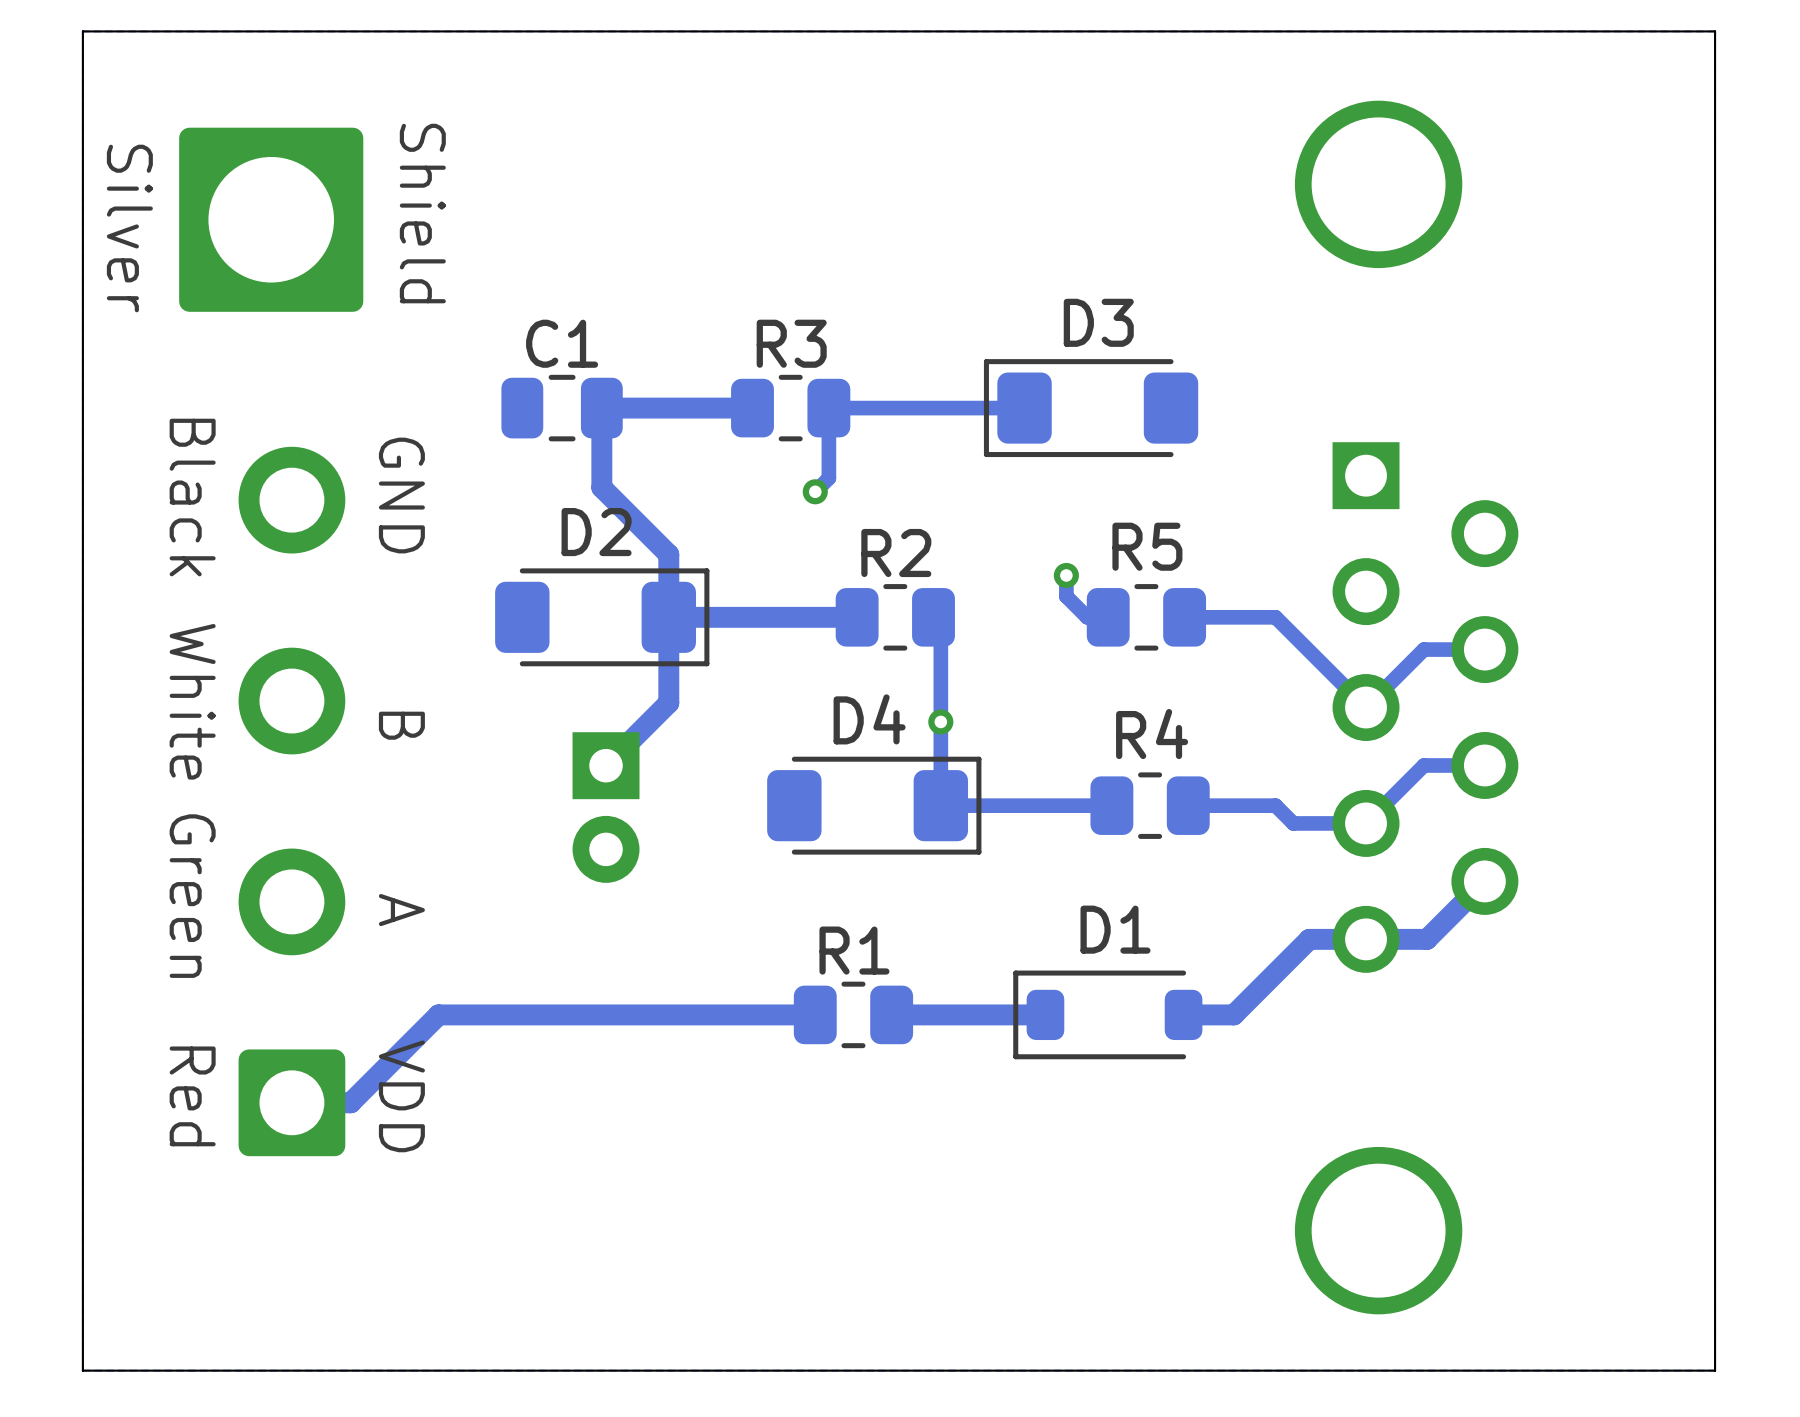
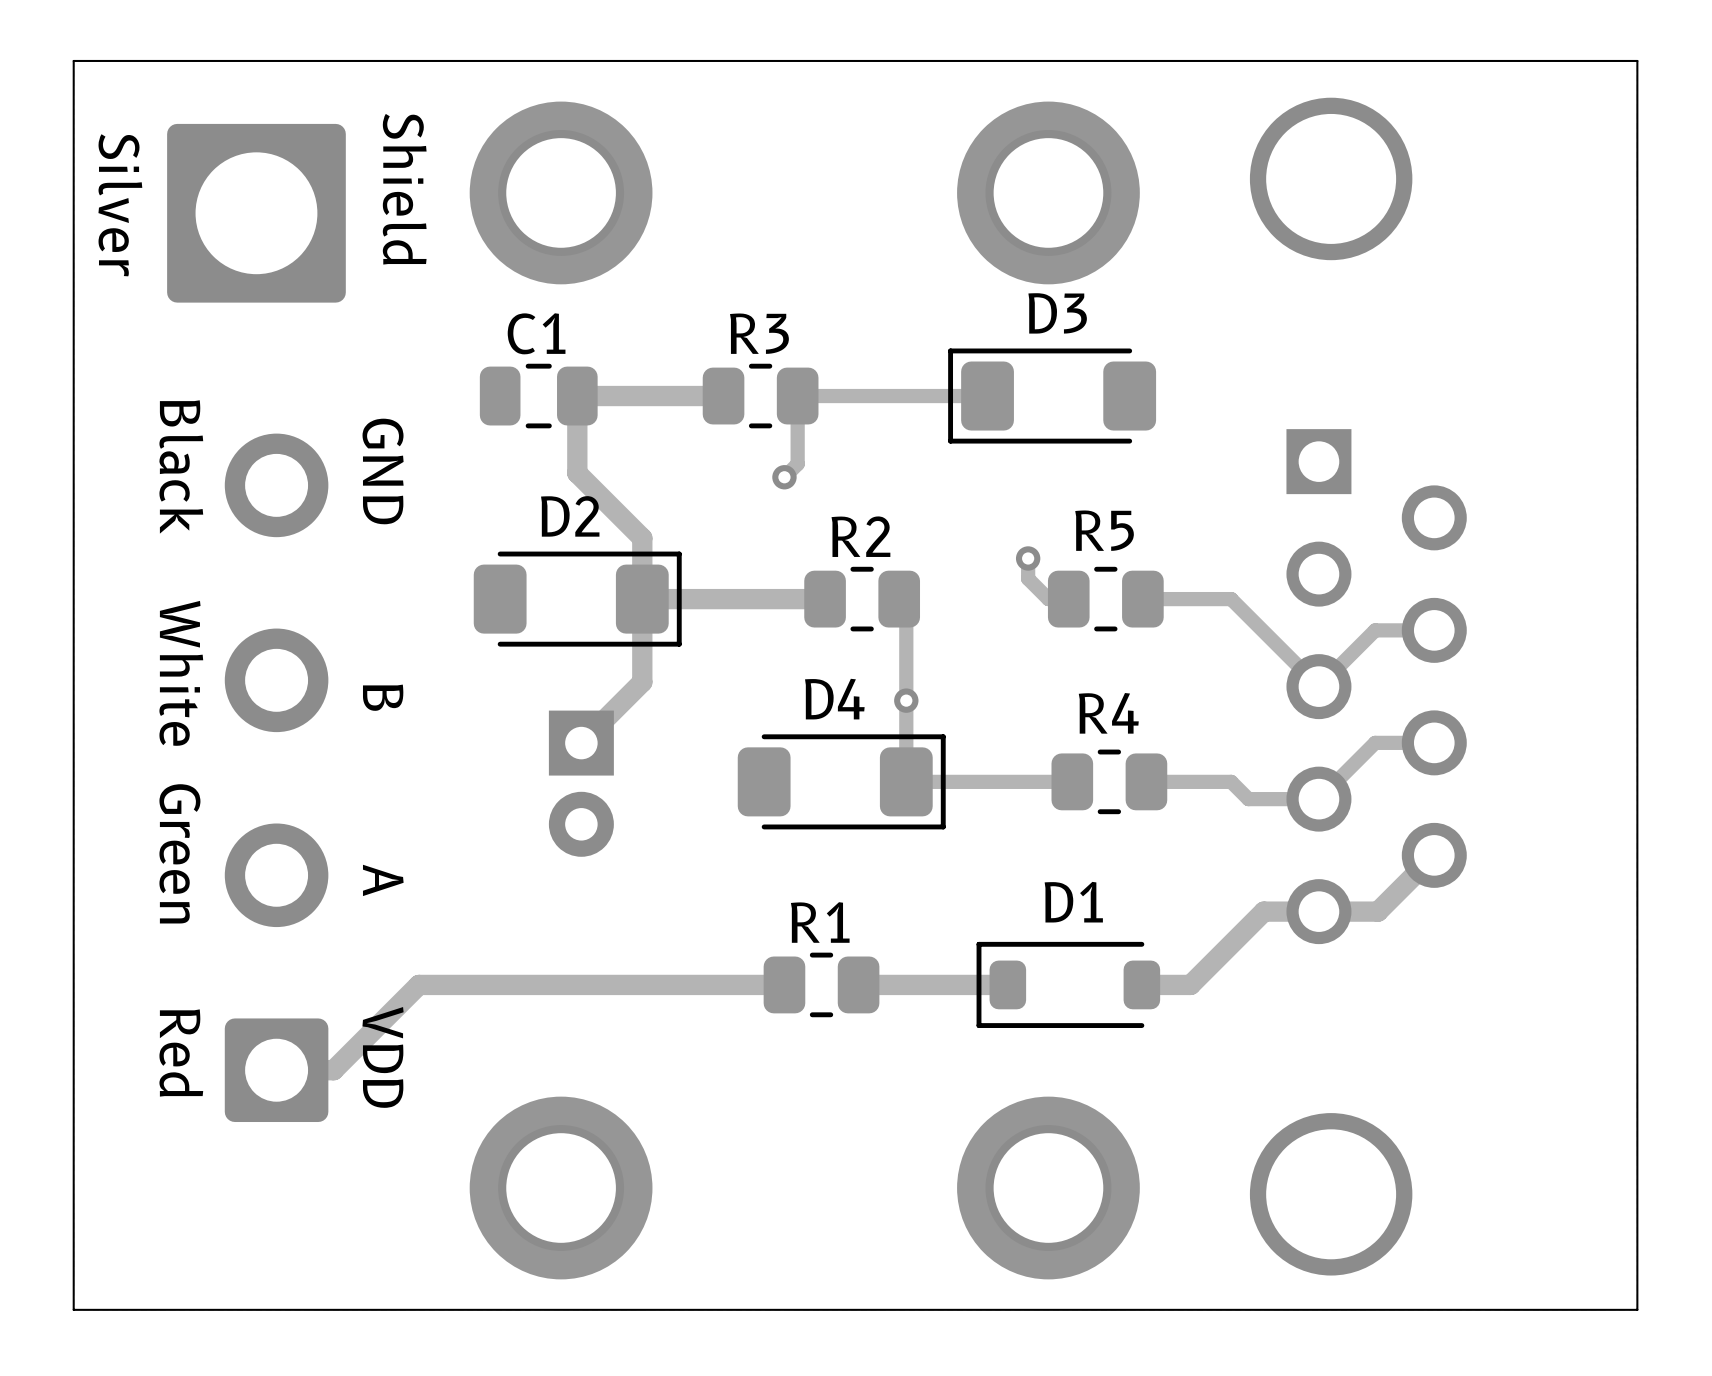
board edge: (82, 62) (82, 31) (1715, 31) (1715, 1370) (82, 1370) (82, 1349) -> (73, 60) (1637, 60) (1637, 1309) (73, 1309)
part: none -> (561, 192)
part: none -> (1048, 192)
part: none -> (561, 1188)
part: none -> (1048, 1188)

